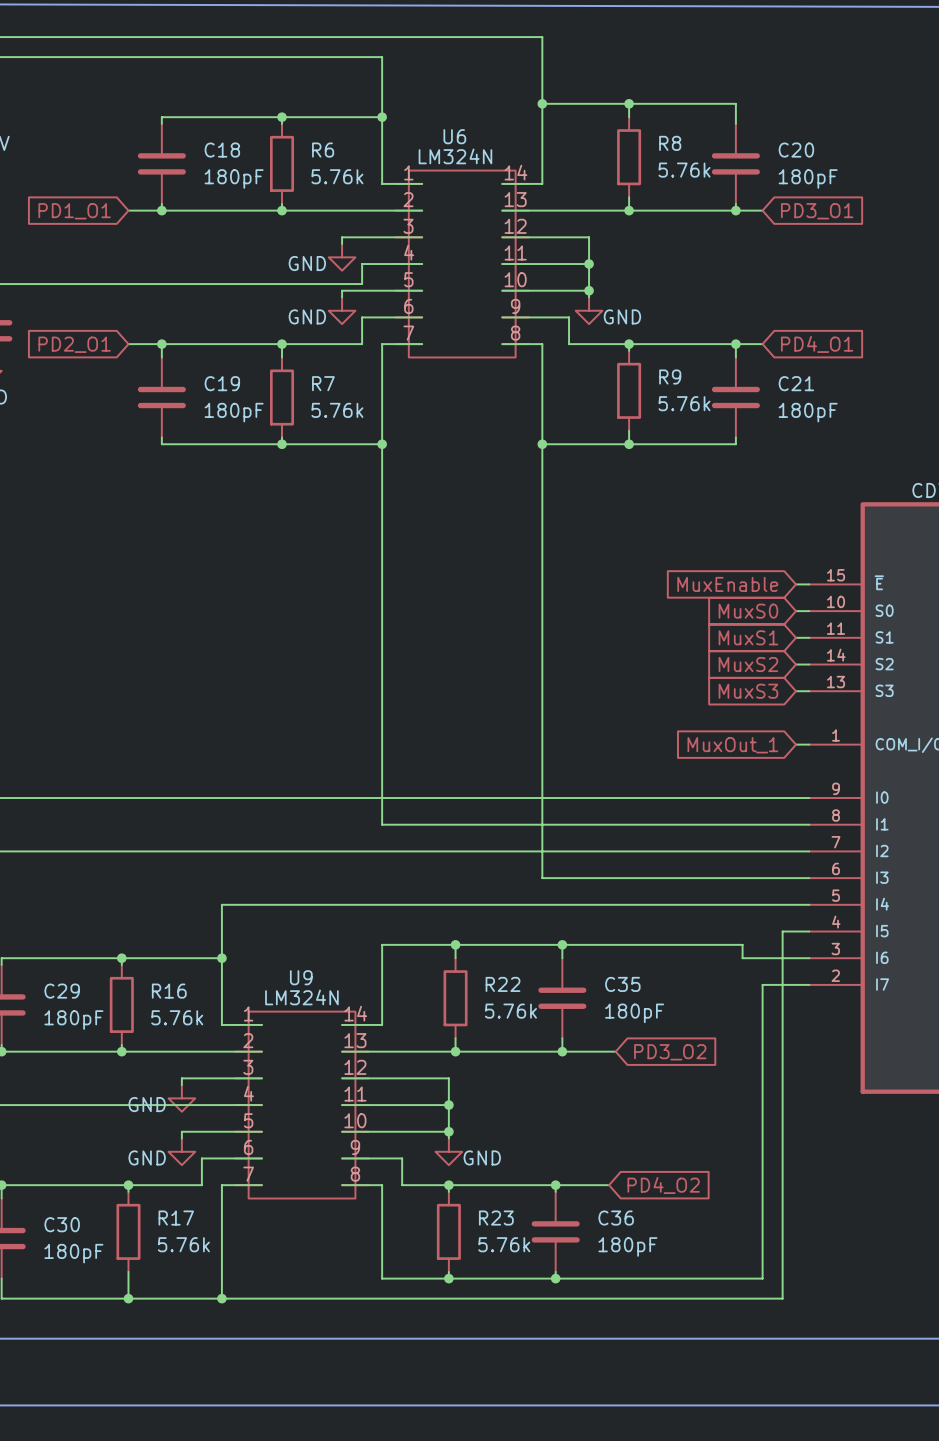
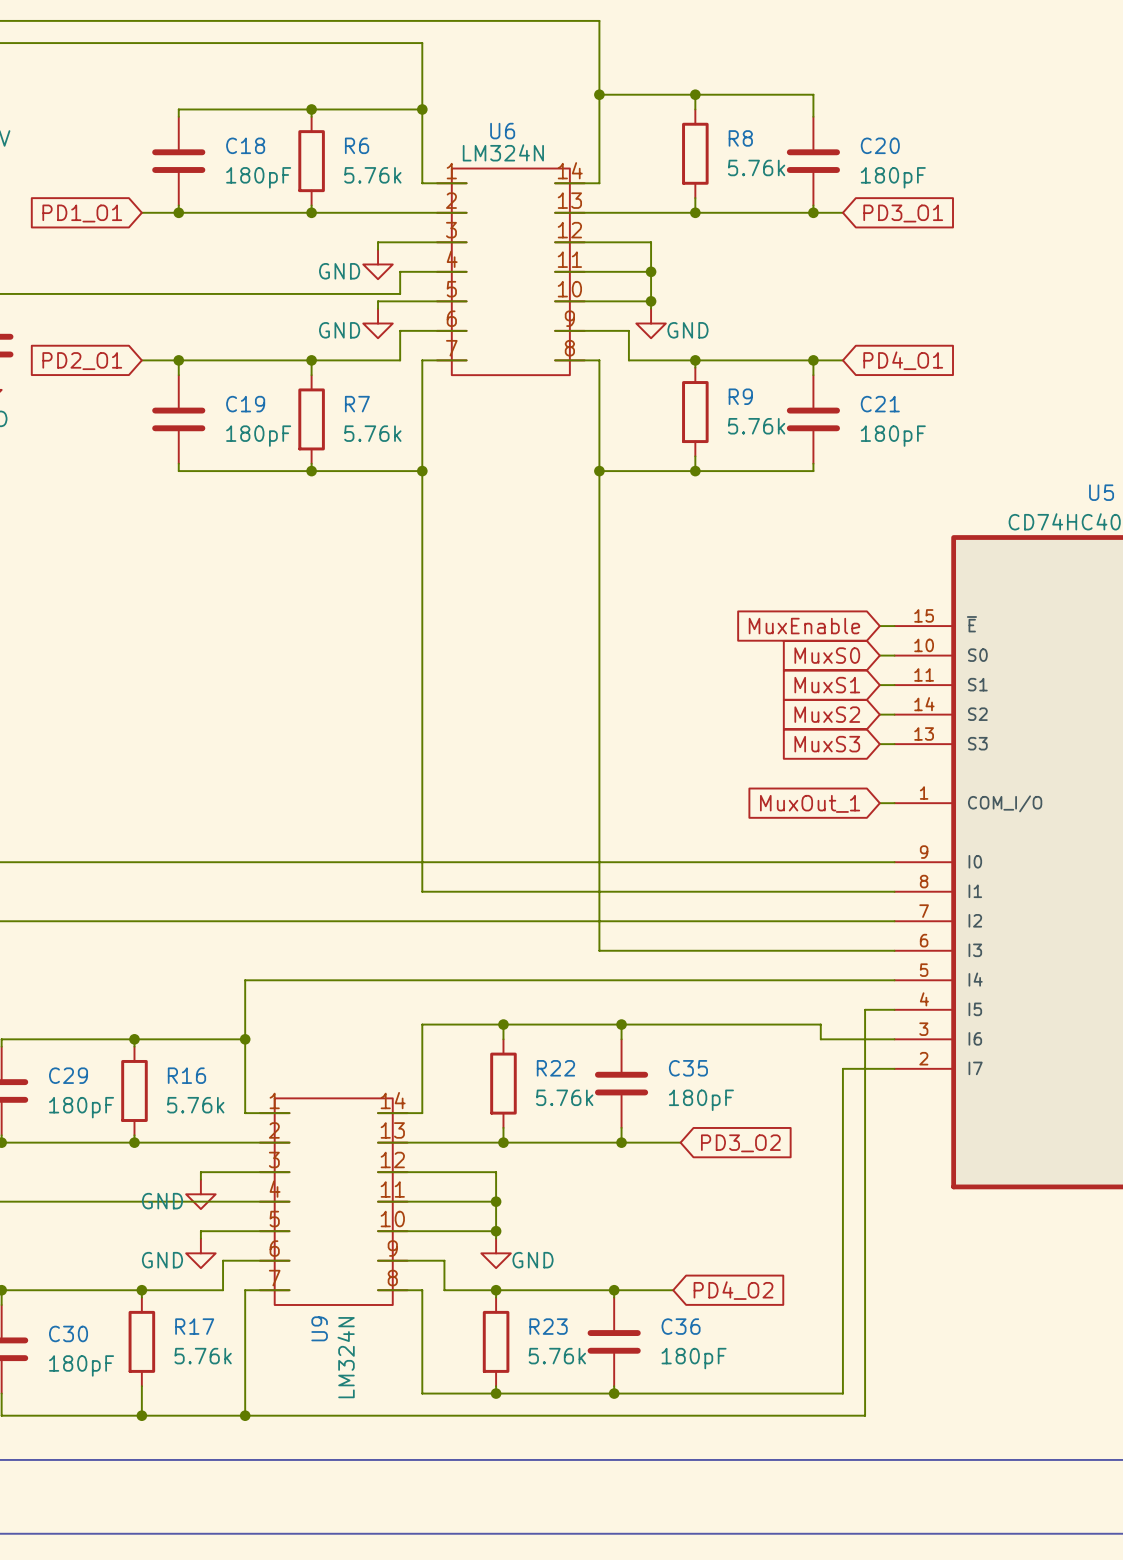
U9 name rotation: 0° (301, 977) -> 90° counterclockwise (319, 1328)
U9 name position: U9 (301, 977) -> U9 (319, 1328)
U9 value rotation: 0° (301, 997) -> 90° counterclockwise (346, 1357)
U9 value position: LM324N (301, 997) -> LM324N (346, 1357)

